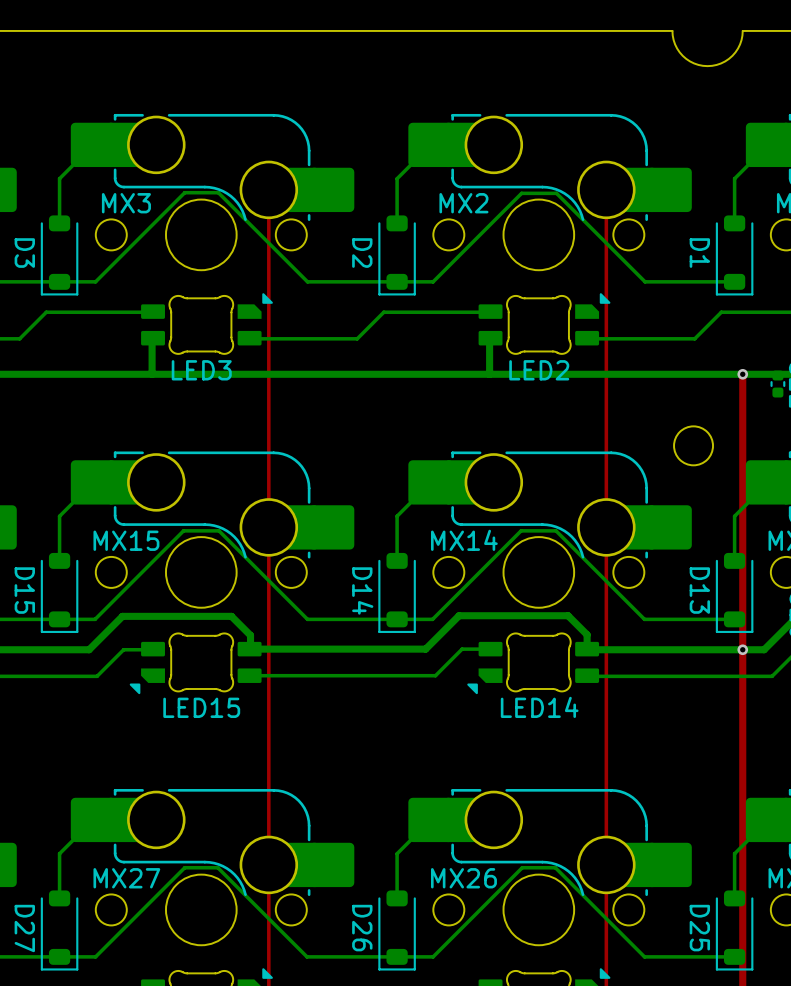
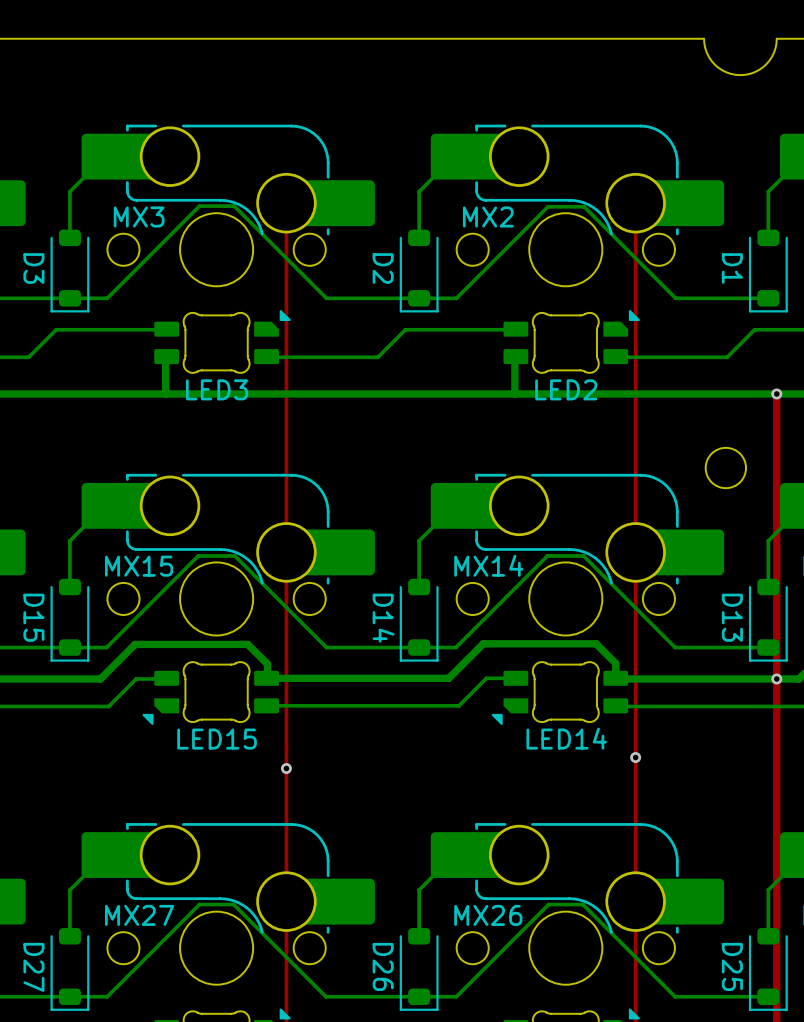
via: none -> (635, 757)
via: none -> (286, 768)

